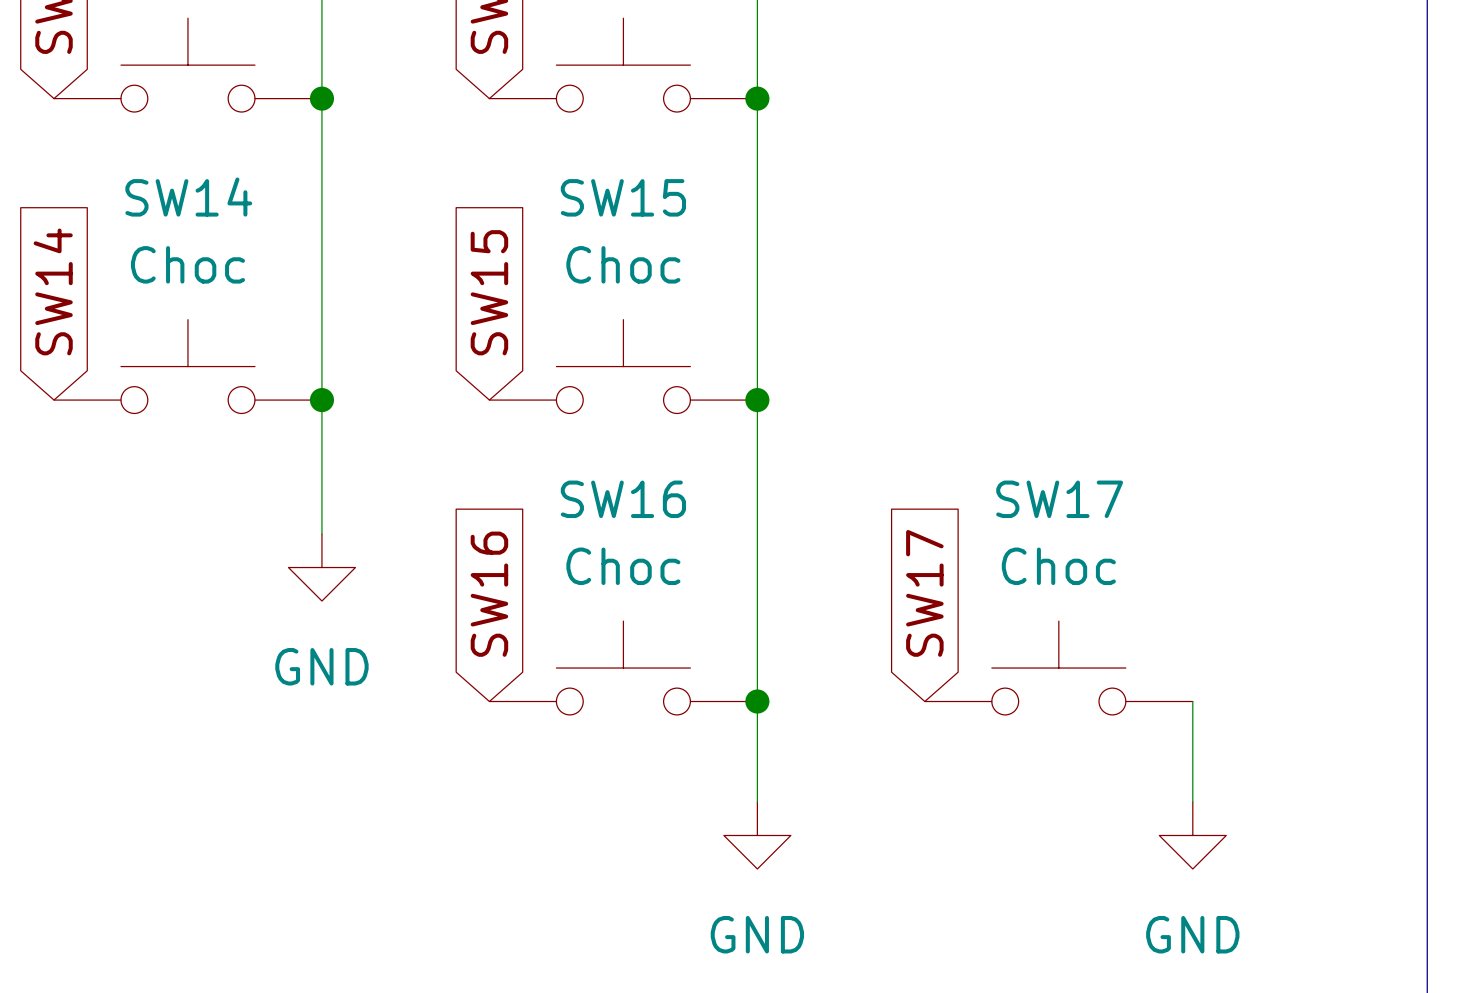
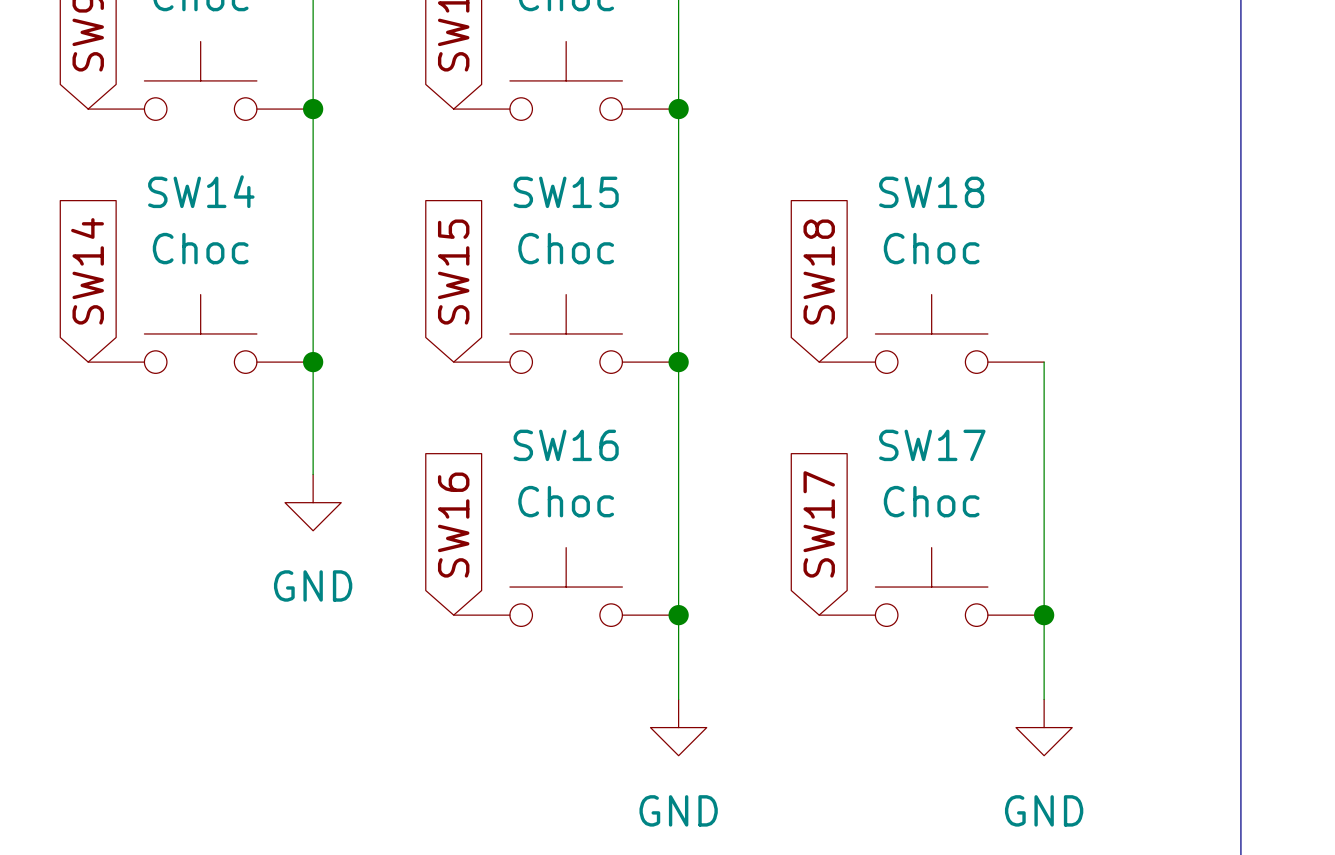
global label: none -> SW18 (819, 272)
SW18: none -> Choc (931, 333)
wire: none -> (1044, 362) (1044, 615)
junction: none -> (1044, 615)

